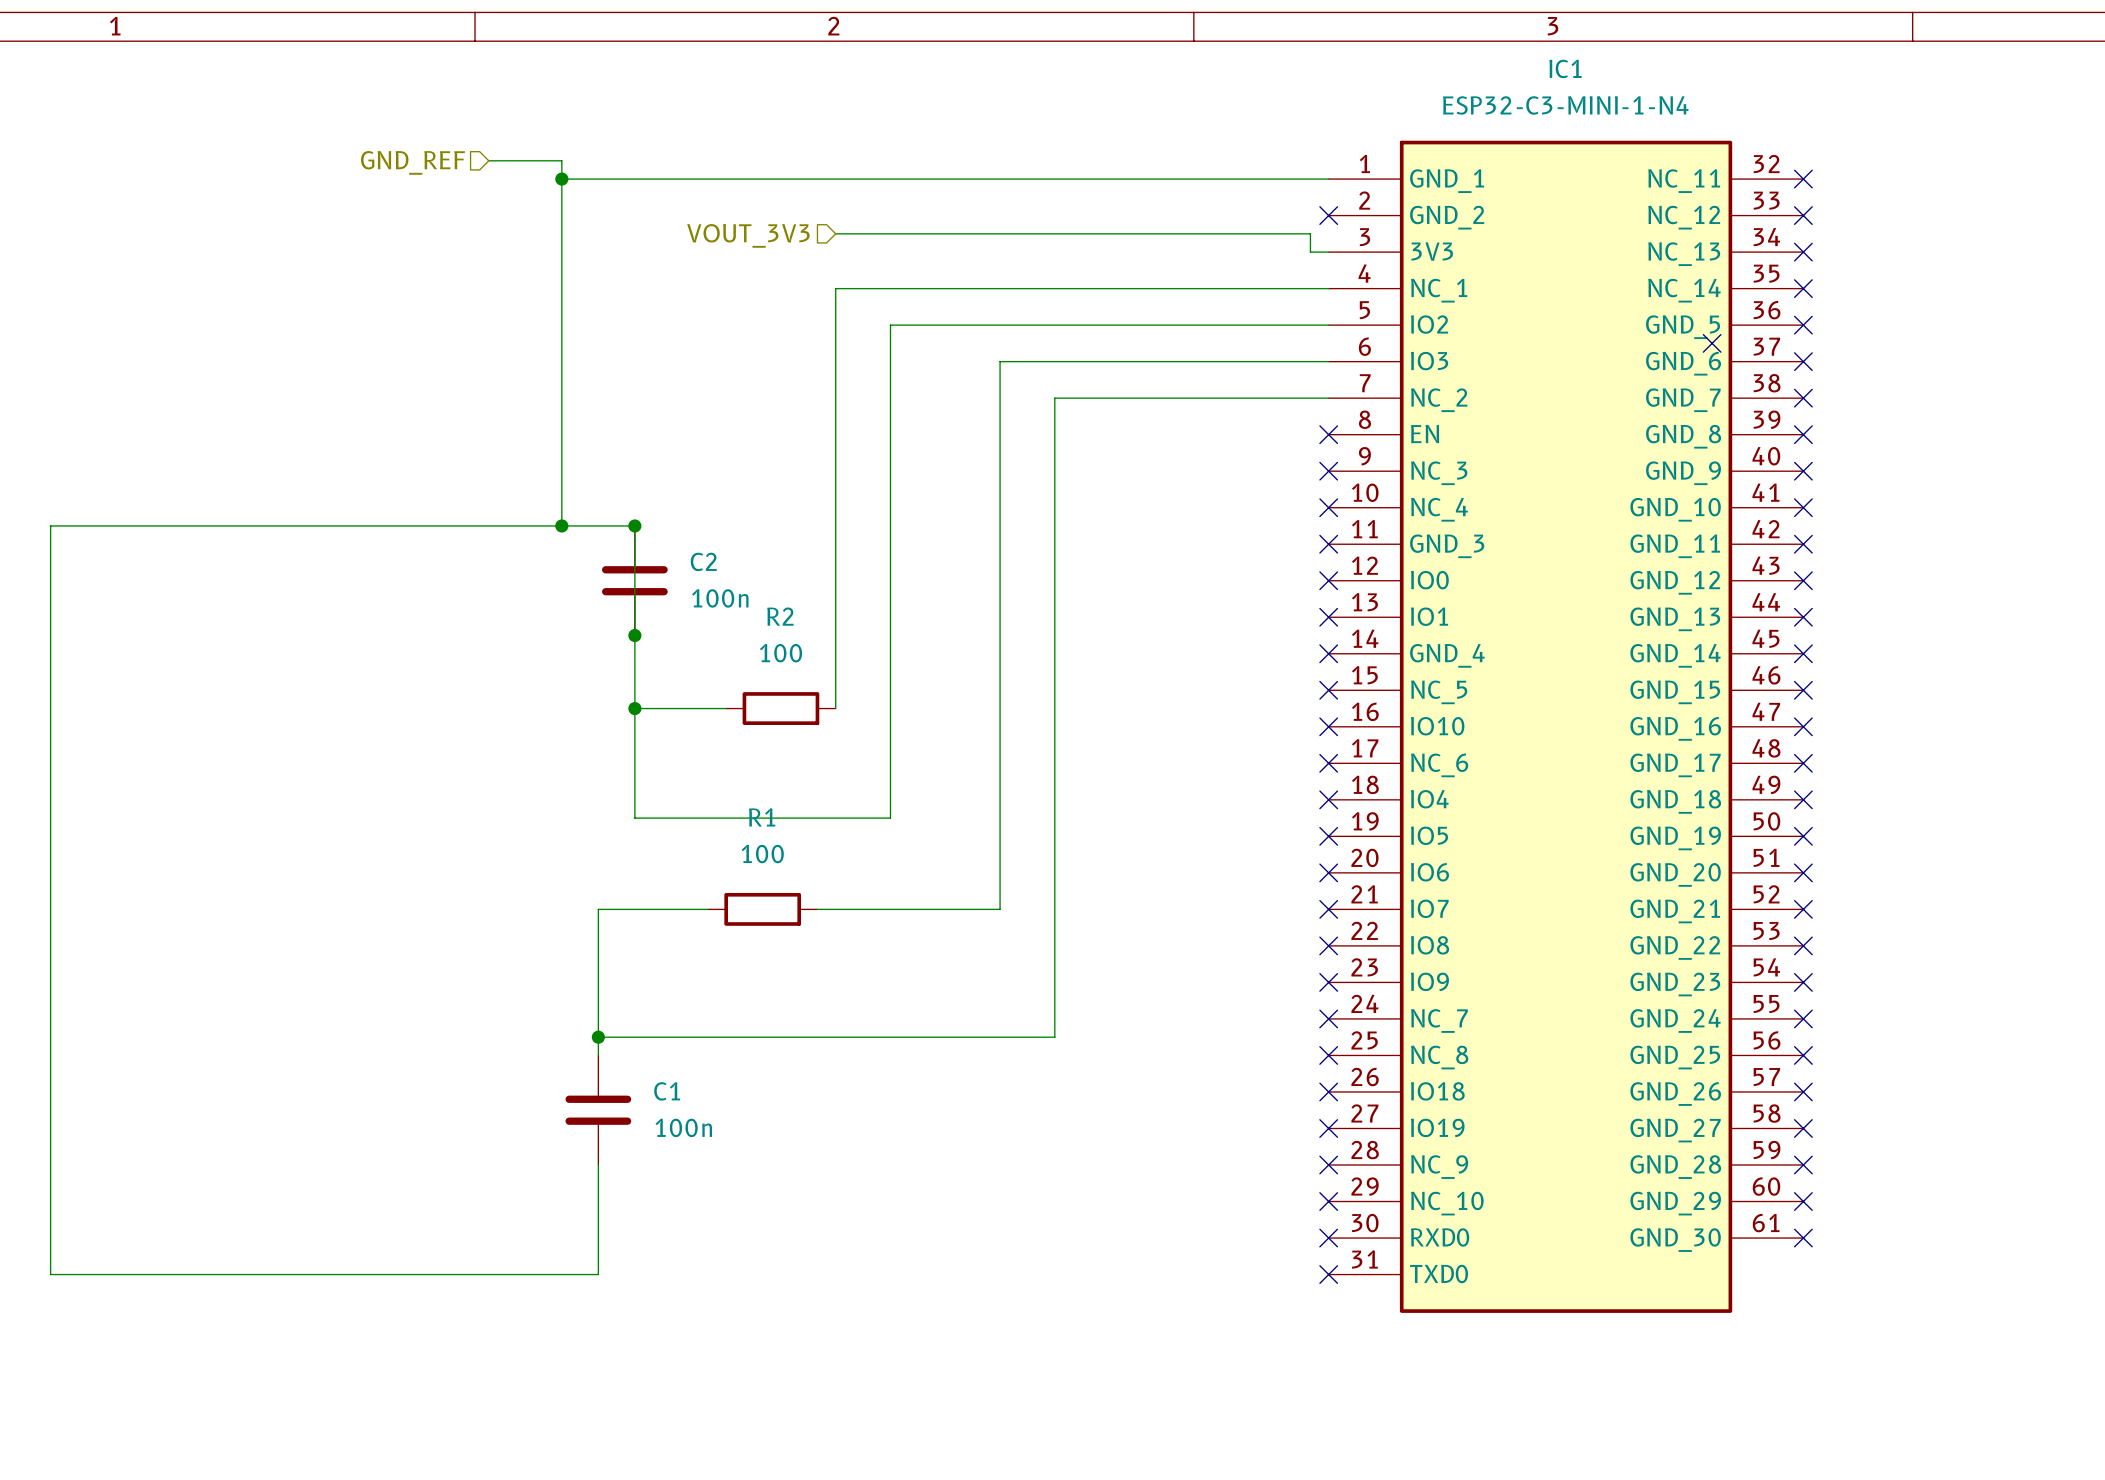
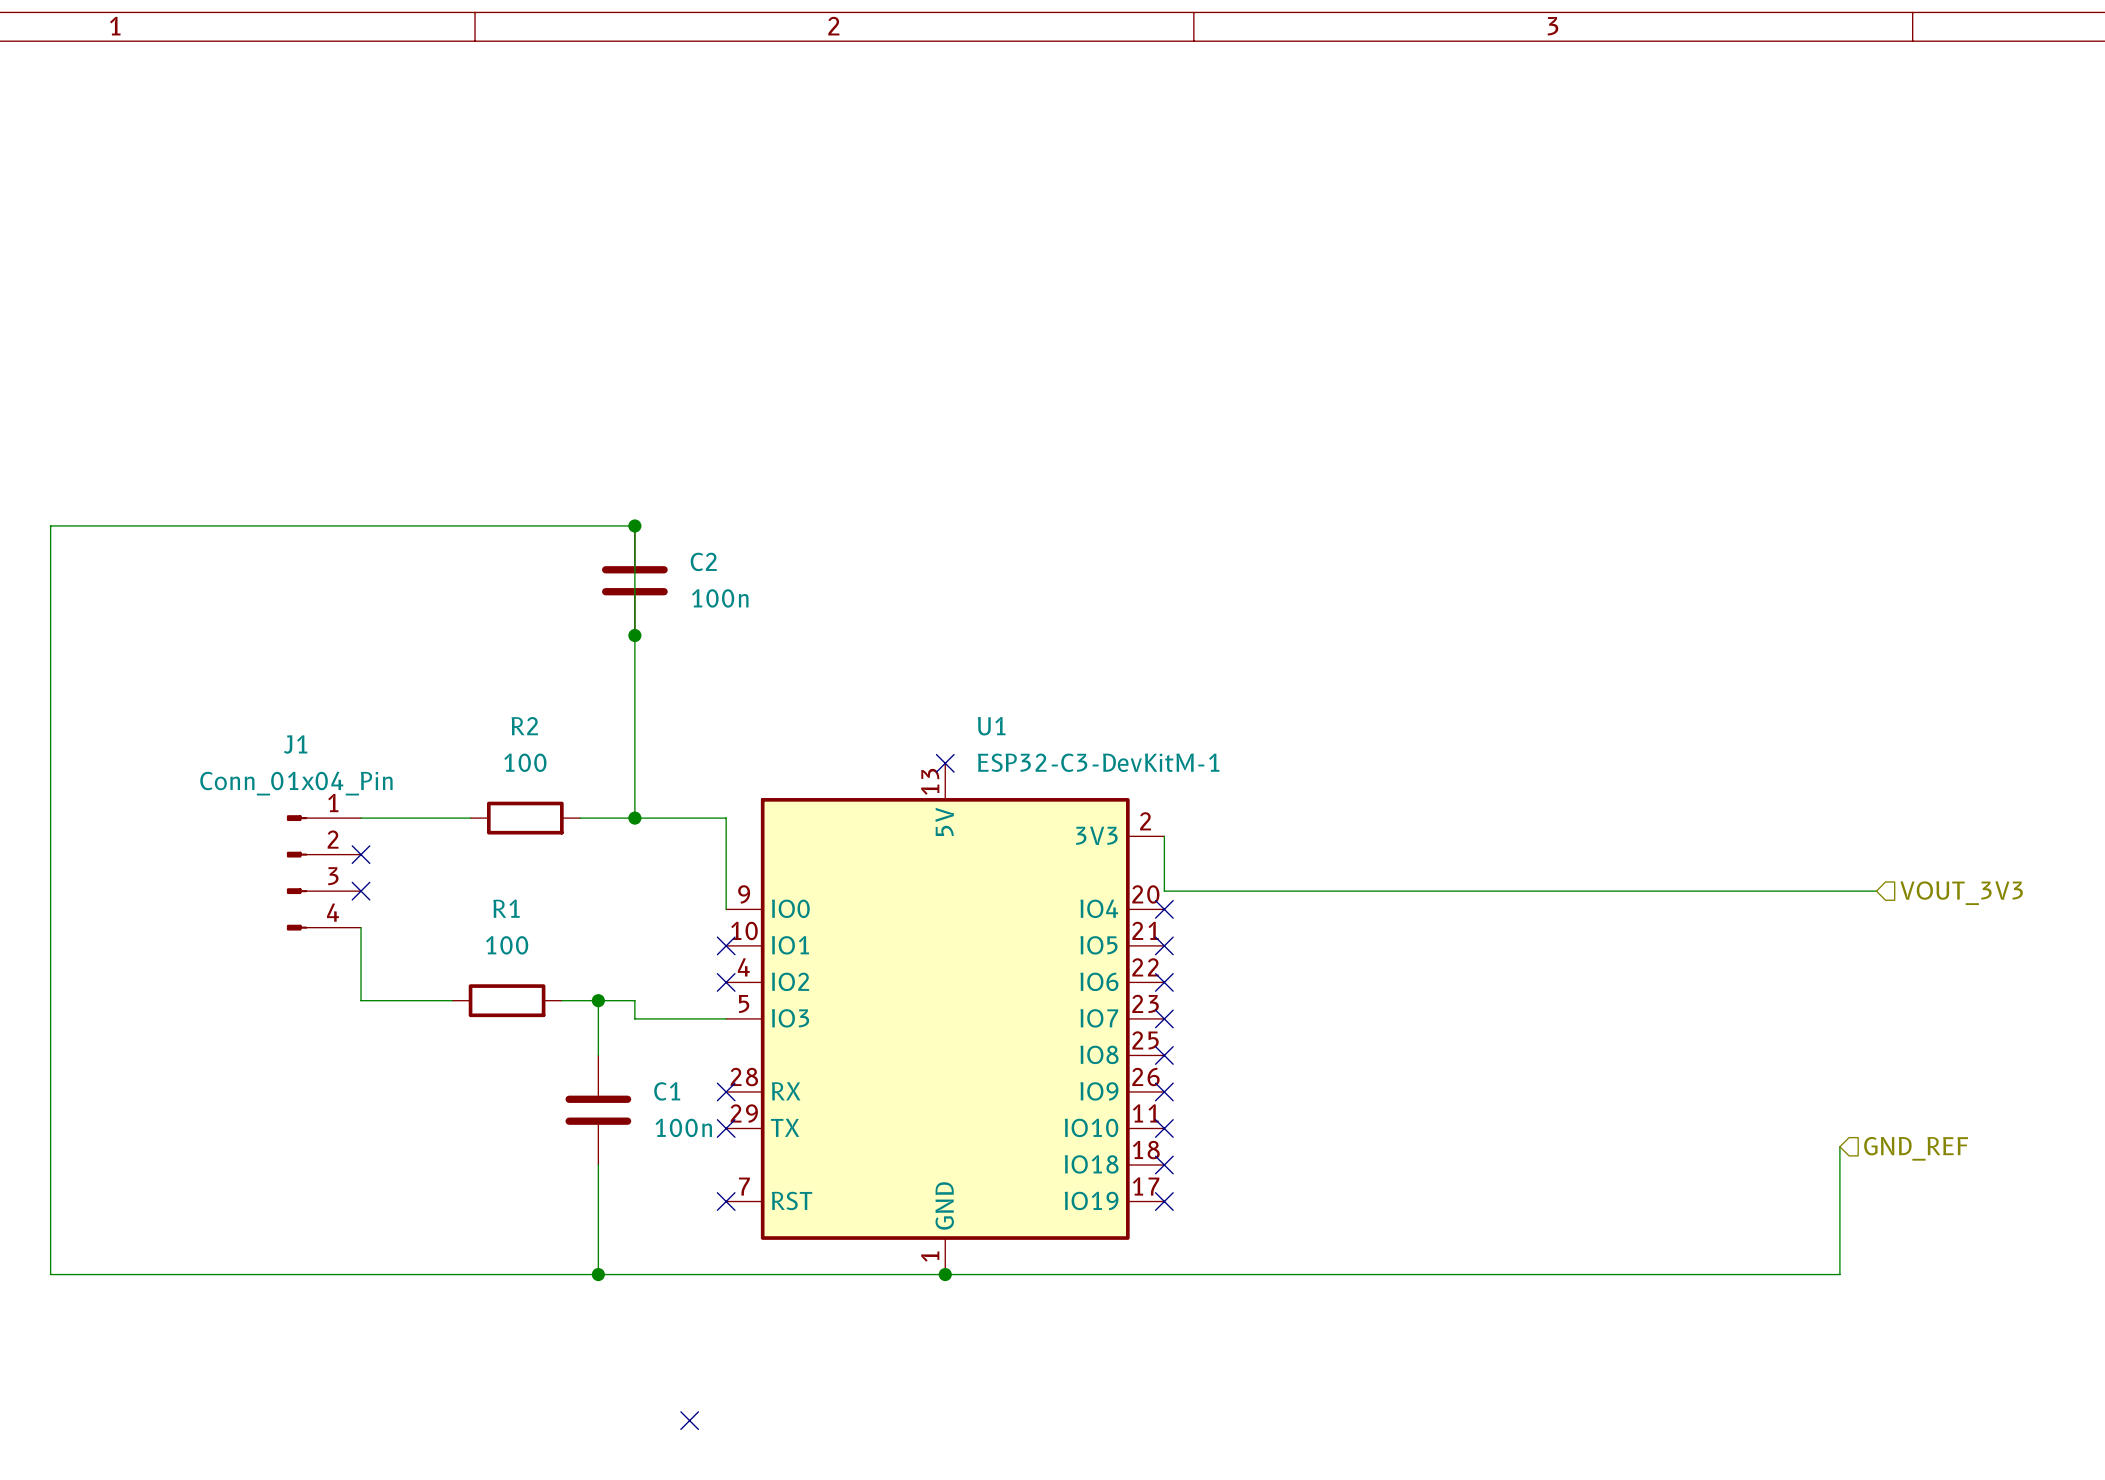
wire: (488, 160) (561, 160) (561, 525) -> none
hierarchical label: GND_REF (412, 162) -> none
wire: (561, 179) (1328, 179) -> none
junction: (561, 179) -> none
no-connect mark: (1803, 179) -> none
no-connect mark: (1328, 215) -> none
no-connect mark: (1803, 215) -> none
wire: (835, 233) (1310, 233) (1310, 252) (1328, 252) -> none
hierarchical label: VOUT_3V3 (748, 235) -> none
no-connect mark: (1803, 252) -> none
wire: (1328, 288) (835, 288) (835, 708) -> none
no-connect mark: (1803, 288) -> none
wire: (1328, 325) (890, 325) (890, 818) (726, 818) -> (726, 909) (726, 818)
no-connect mark: (1803, 325) -> none
no-connect mark: (1712, 343) -> none
wire: (1328, 361) (1000, 361) (1000, 909) (817, 909) -> none
no-connect mark: (1803, 361) -> none
wire: (1328, 398) (1054, 398) (1054, 1037) (598, 1037) -> none
no-connect mark: (1803, 398) -> none
no-connect mark: (1328, 434) -> none
no-connect mark: (1803, 434) -> none
no-connect mark: (1328, 471) -> none
no-connect mark: (1803, 471) -> none
no-connect mark: (1328, 507) -> none
no-connect mark: (1803, 507) -> none
junction: (561, 525) -> none
no-connect mark: (1328, 544) -> none
no-connect mark: (1803, 544) -> none
no-connect mark: (1328, 580) -> none
no-connect mark: (1803, 580) -> none
no-connect mark: (1328, 617) -> none
no-connect mark: (1803, 617) -> none
no-connect mark: (1328, 653) -> none
no-connect mark: (1803, 653) -> none
no-connect mark: (1328, 690) -> none
no-connect mark: (1803, 690) -> none
wire: (634, 708) (726, 708) -> none
junction: (634, 708) -> none
R2 position: (780, 708) -> (525, 818)
no-connect mark: (1328, 726) -> none
IC1: ESP32-C3-MINI-1-N4 (1566, 726) -> none
no-connect mark: (1803, 726) -> none
no-connect mark: none -> (945, 763)
no-connect mark: (1328, 763) -> none
no-connect mark: (1803, 763) -> none
no-connect mark: (1328, 799) -> none
no-connect mark: (1803, 799) -> none
wire: none -> (361, 818) (470, 818)
wire: none -> (580, 818) (634, 818)
junction: none -> (634, 818)
wire: none -> (1164, 836) (1164, 891) (1876, 891)
no-connect mark: (1328, 836) -> none
no-connect mark: (1803, 836) -> none
no-connect mark: none -> (361, 854)
J1: none -> Conn_01x04_Pin (323, 872)
no-connect mark: (1328, 872) -> none
no-connect mark: (1803, 872) -> none
no-connect mark: none -> (361, 891)
hierarchical label: none -> VOUT_3V3 (1961, 893)
wire: (707, 909) (598, 909) (598, 1000) -> none
R1 position: (762, 909) -> (507, 1000)
no-connect mark: none -> (1164, 909)
no-connect mark: (1328, 909) -> none
no-connect mark: (1803, 909) -> none
wire: none -> (361, 927) (361, 1000) (452, 1000)
no-connect mark: none -> (726, 945)
no-connect mark: none -> (1164, 945)
no-connect mark: (1328, 945) -> none
no-connect mark: (1803, 945) -> none
no-connect mark: none -> (726, 982)
no-connect mark: none -> (1164, 982)
no-connect mark: (1328, 982) -> none
no-connect mark: (1803, 982) -> none
wire: none -> (561, 1000) (634, 1000) (634, 1018) (726, 1018)
U1: none -> ESP32-C3-DevKitM-1 (945, 1018)
no-connect mark: none -> (1164, 1018)
no-connect mark: (1328, 1018) -> none
no-connect mark: (1803, 1018) -> none
junction position: (598, 1037) -> (598, 1000)
no-connect mark: none -> (1164, 1055)
no-connect mark: (1328, 1055) -> none
no-connect mark: (1803, 1055) -> none
no-connect mark: none -> (726, 1091)
no-connect mark: none -> (1164, 1091)
no-connect mark: (1328, 1091) -> none
no-connect mark: (1803, 1091) -> none
no-connect mark: none -> (726, 1128)
no-connect mark: none -> (1164, 1128)
no-connect mark: (1328, 1128) -> none
no-connect mark: (1803, 1128) -> none
wire: none -> (1839, 1146) (1839, 1274) (598, 1274)
hierarchical label: none -> GND_REF (1916, 1148)
no-connect mark: none -> (1164, 1165)
no-connect mark: (1328, 1165) -> none
no-connect mark: (1803, 1165) -> none
no-connect mark: none -> (726, 1201)
no-connect mark: none -> (1164, 1201)
no-connect mark: (1328, 1201) -> none
no-connect mark: (1803, 1201) -> none
no-connect mark: (1328, 1238) -> none
no-connect mark: (1803, 1238) -> none
junction: none -> (598, 1274)
junction: none -> (945, 1274)
no-connect mark: (1328, 1274) -> none
no-connect mark: none -> (689, 1420)

